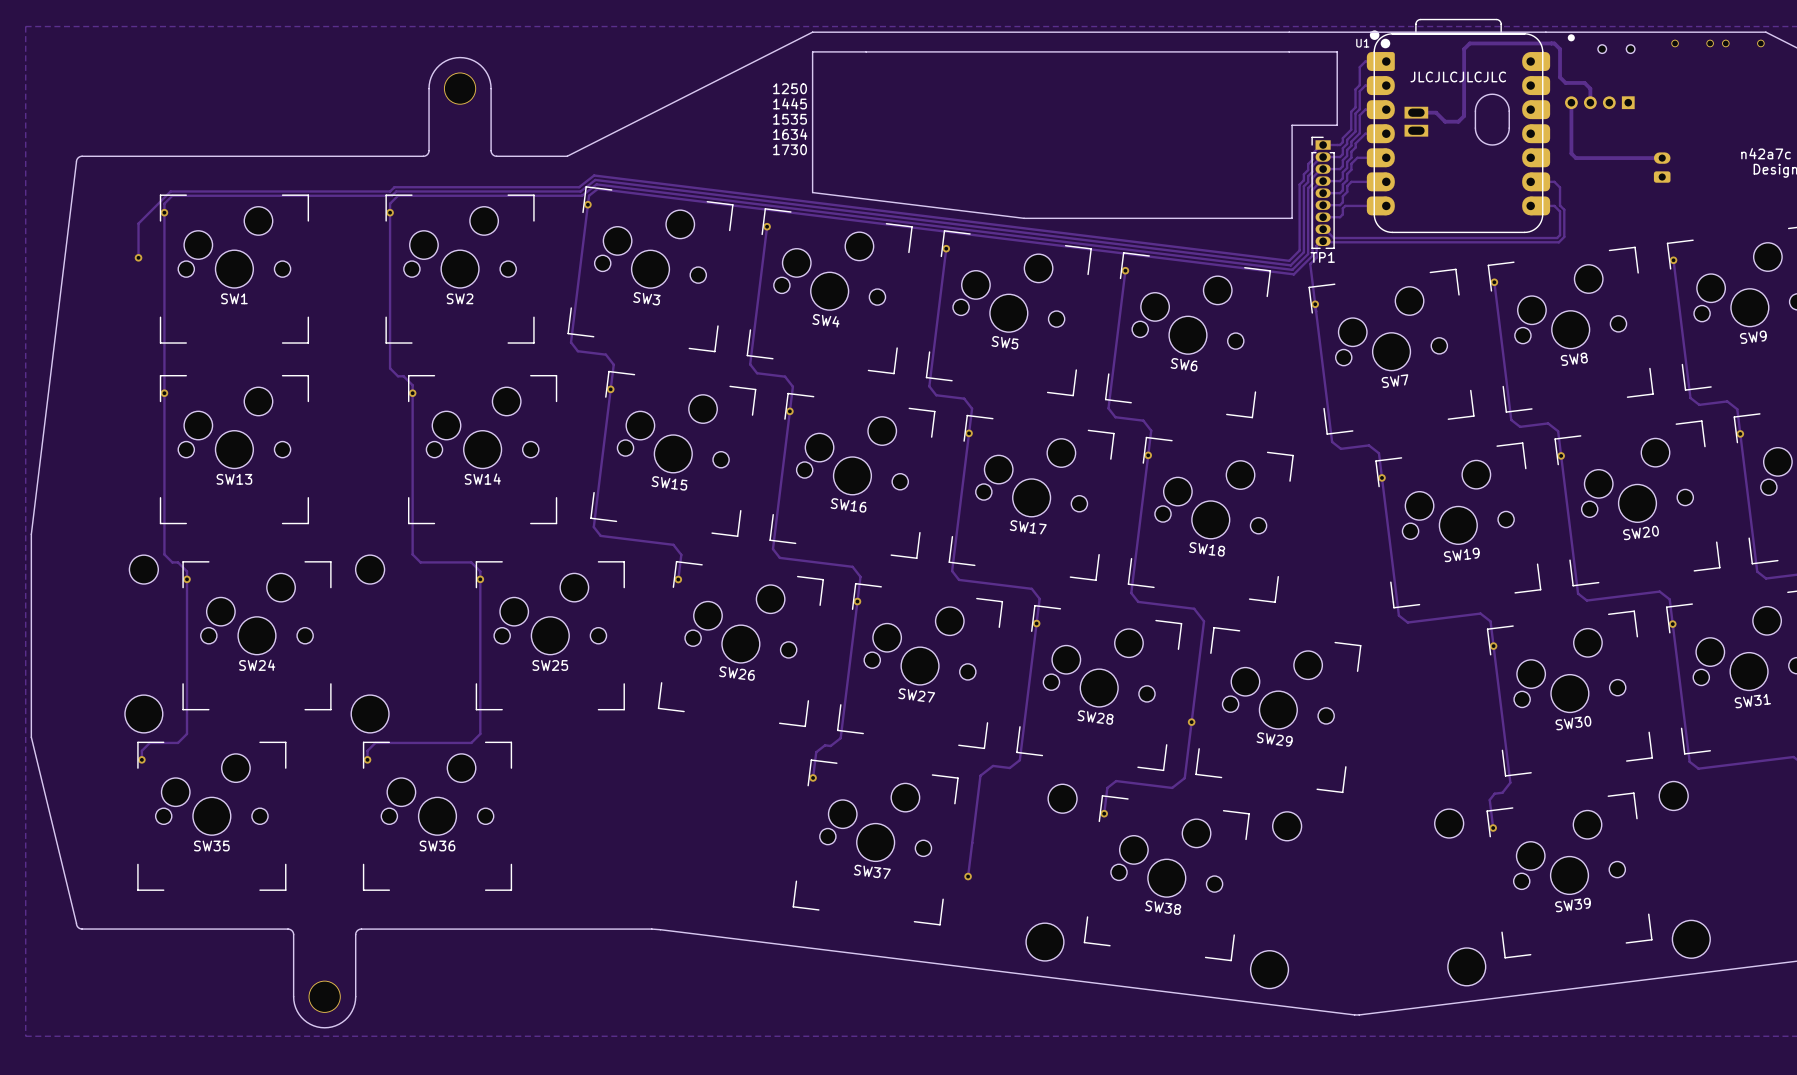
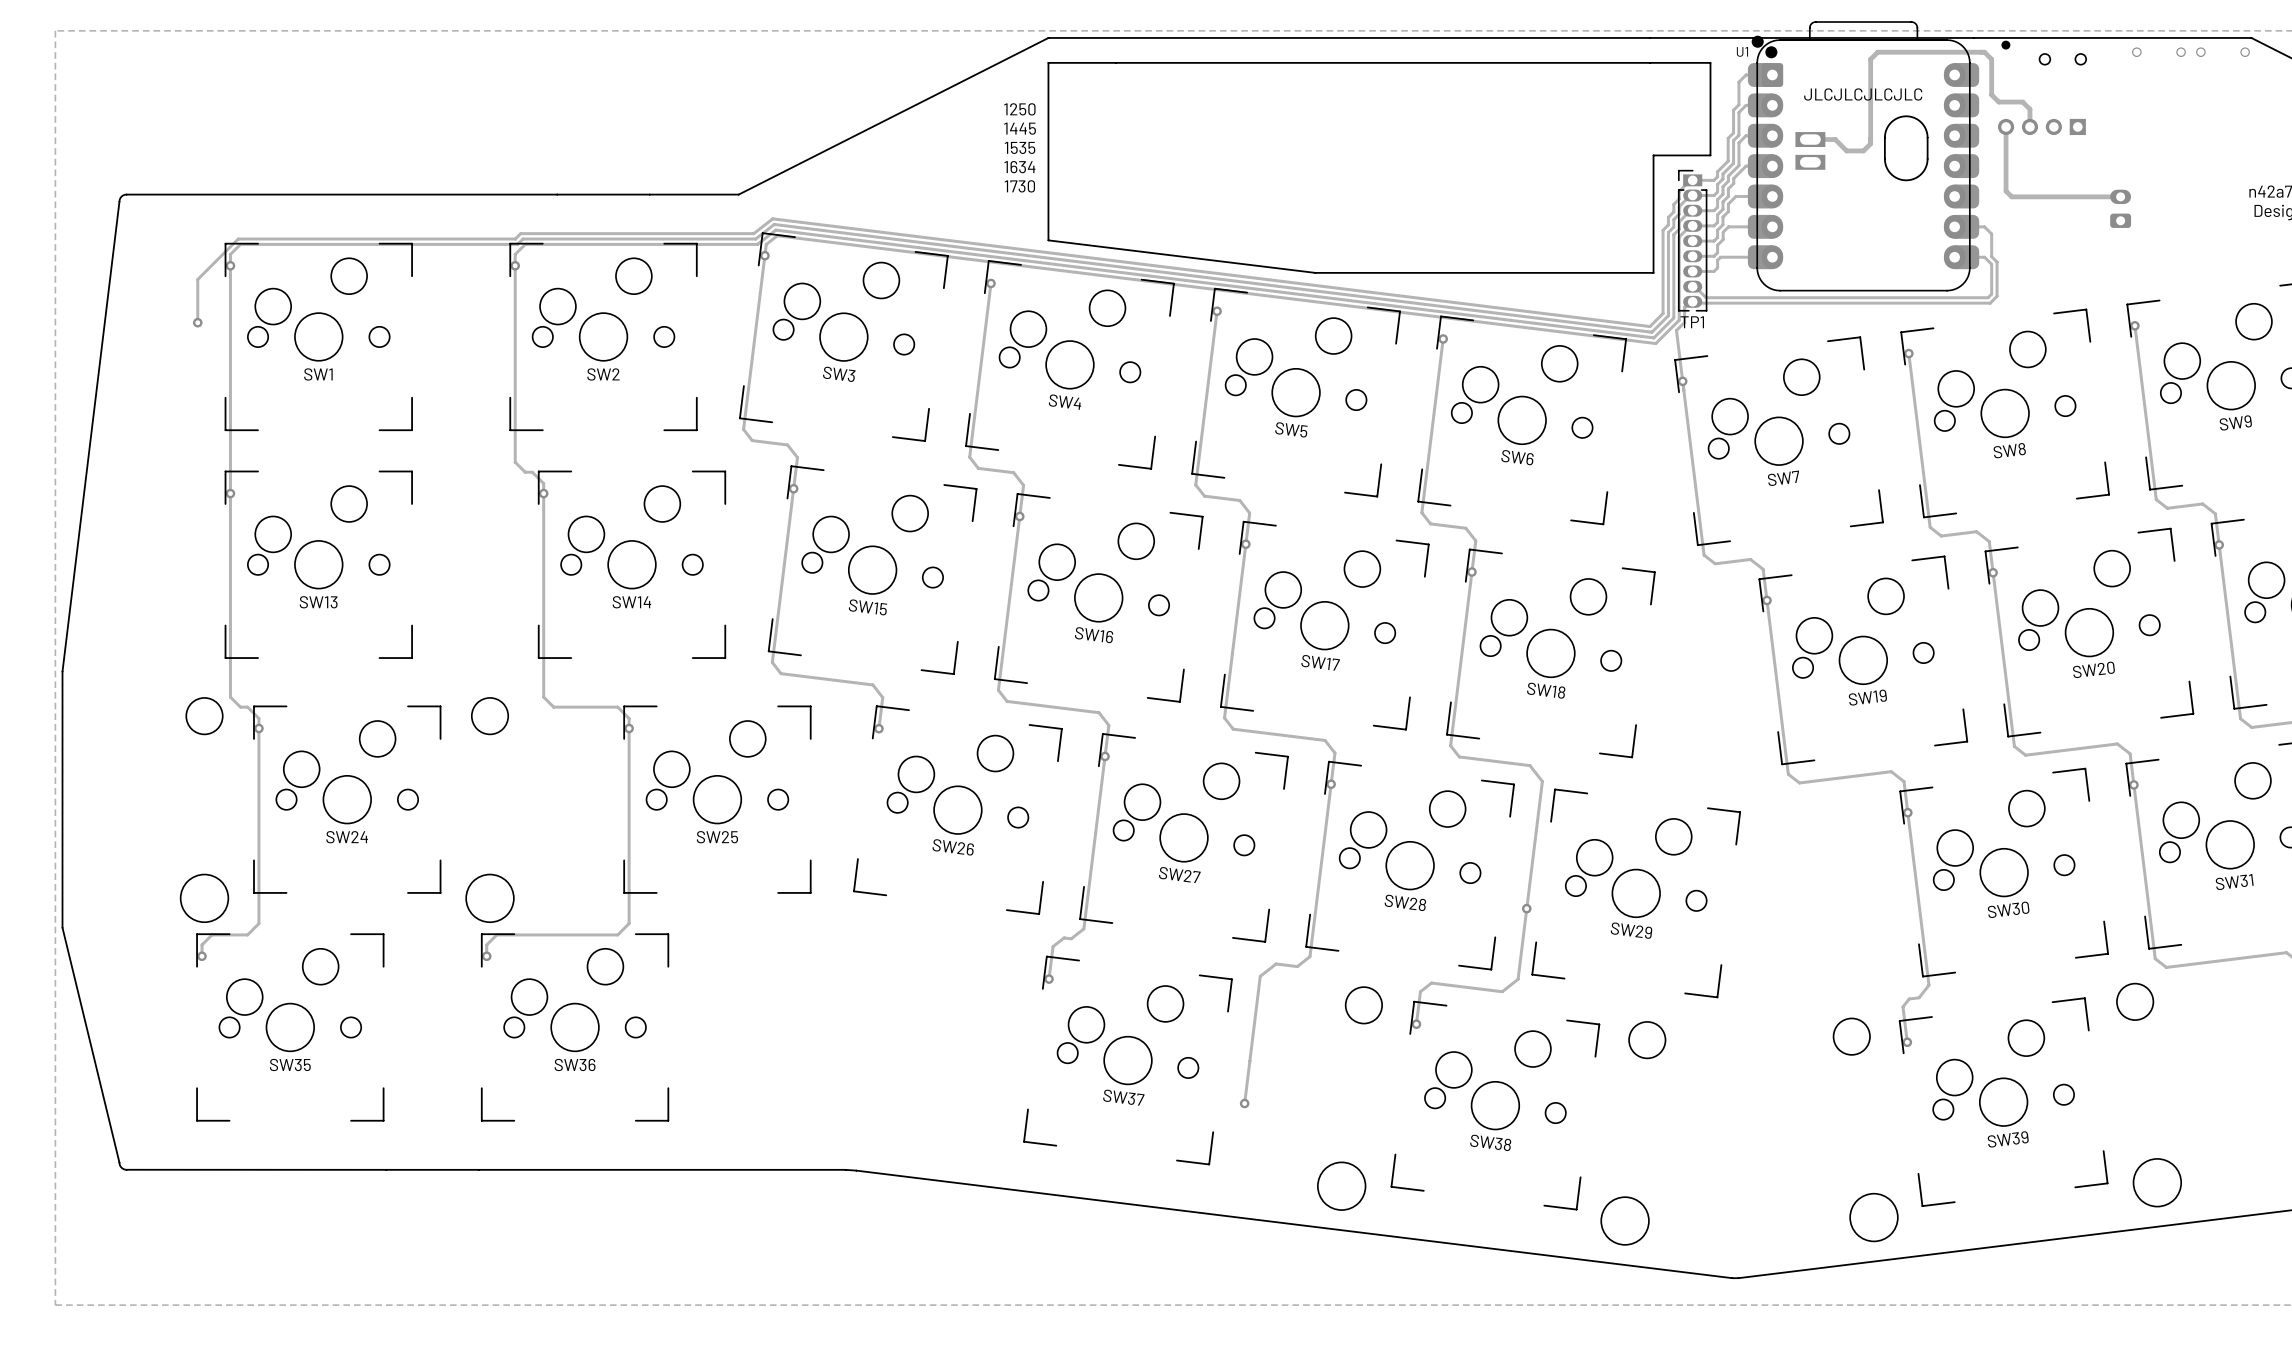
part: (460, 88) -> none
board edge: (423, 156) (428, 151) (429, 88) (431, 77) (442, 63) (460, 57) (477, 63) (489, 77) (491, 88) (491, 151) (496, 156) -> (557, 194) (649, 194)
board edge: (288, 929) (292, 930) (293, 934) -> none
board edge: (361, 929) (355, 934) (355, 996) (353, 1007) (342, 1022) (328, 1027) (317, 1026) (307, 1022) (295, 1007) (293, 996) (293, 934) -> (479, 1169) (386, 1169)
part: (324, 996) -> none

